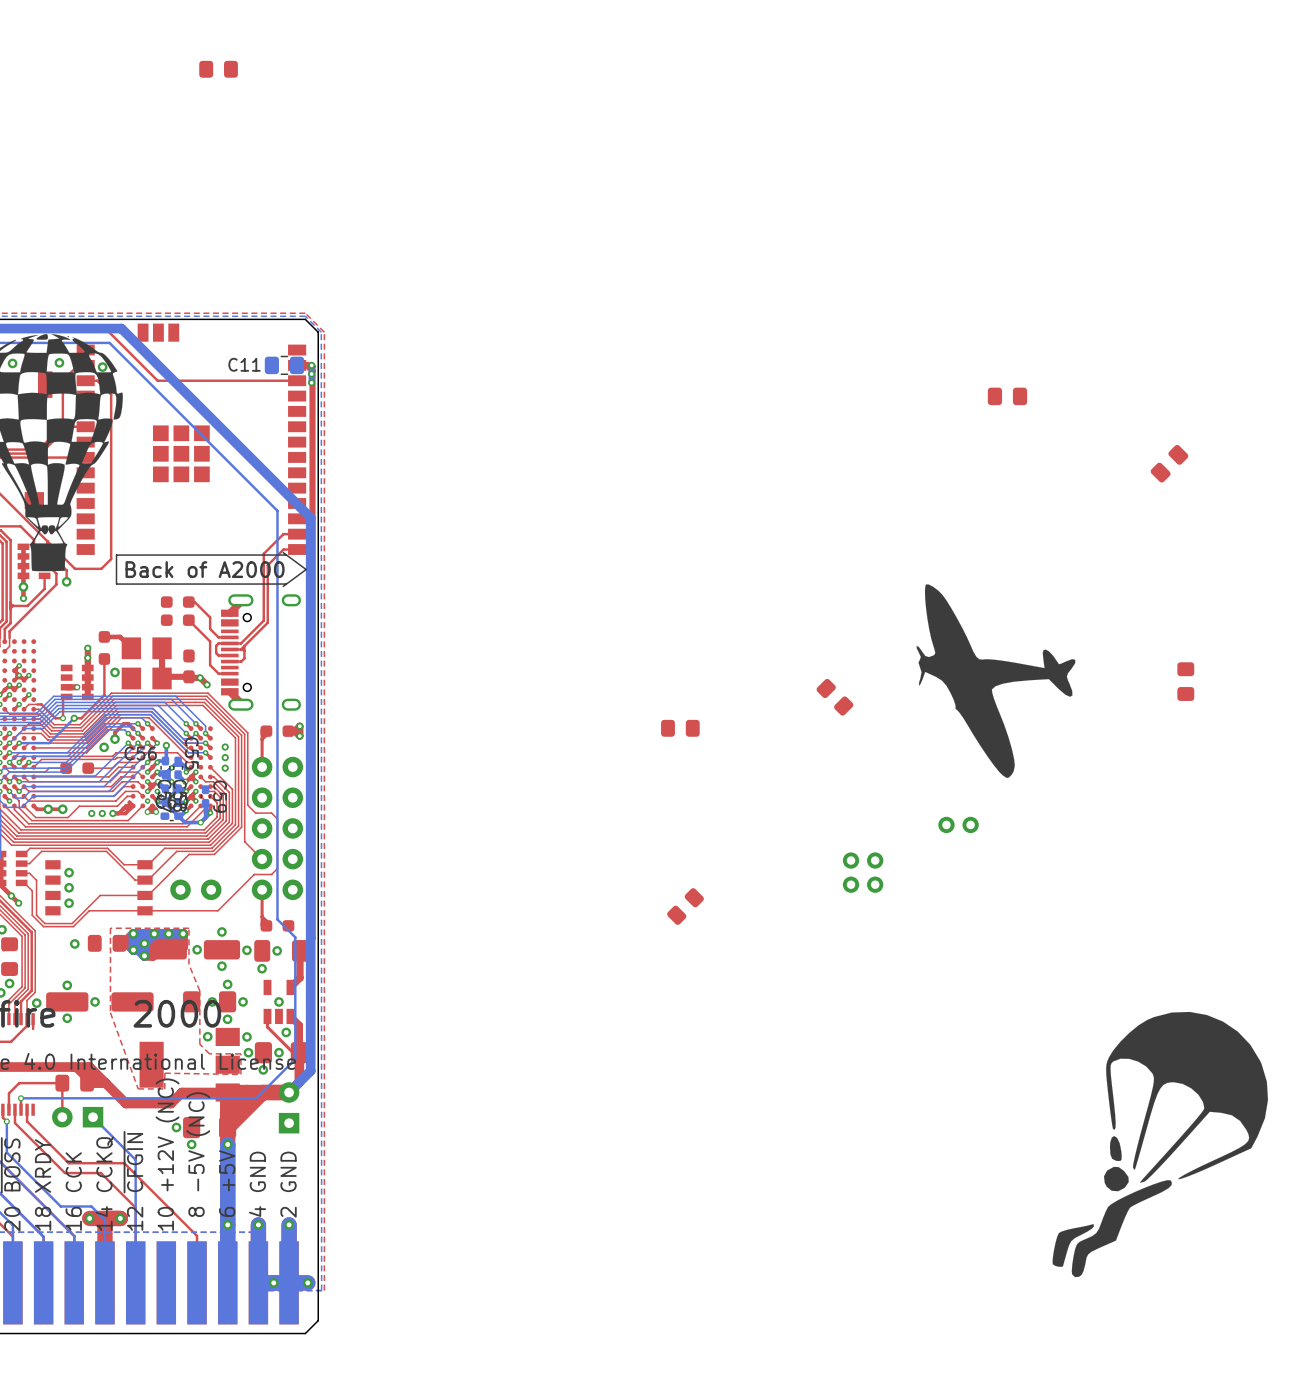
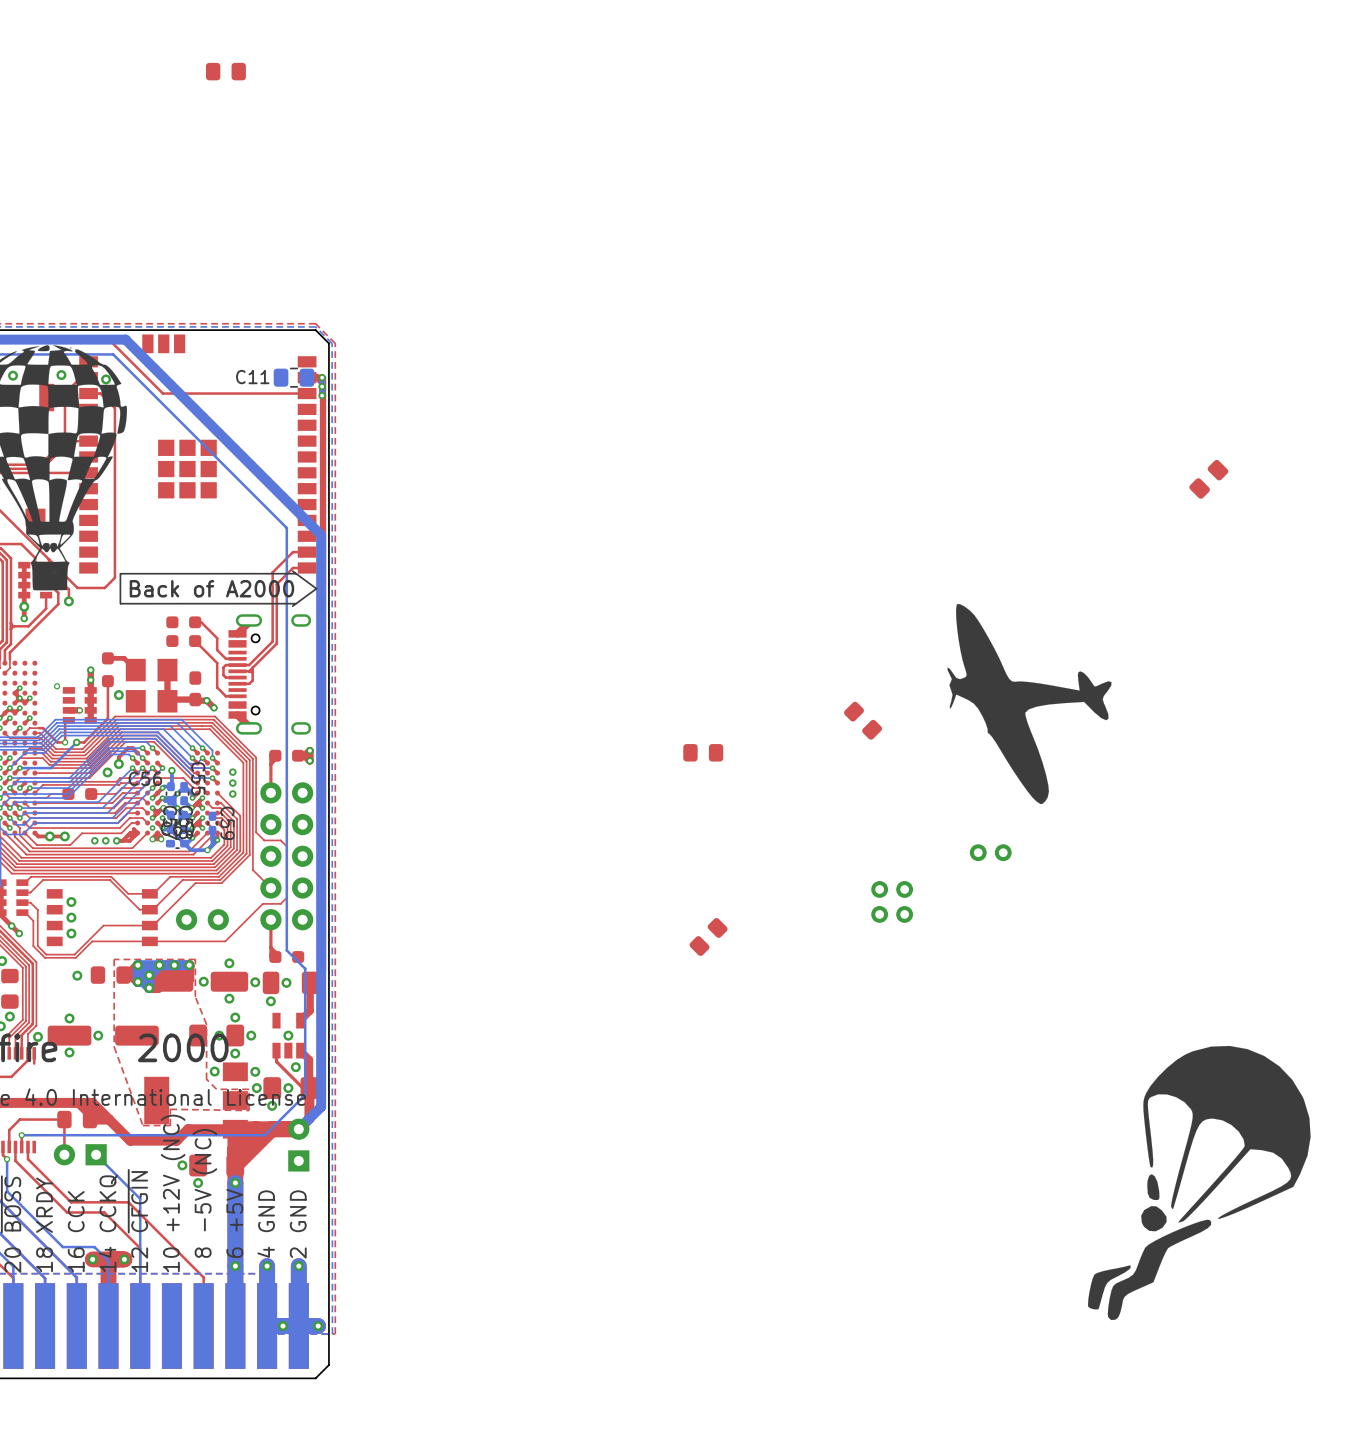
part: (1007, 396) -> none
via: none -> (57, 686)
part: (1185, 681) -> none

